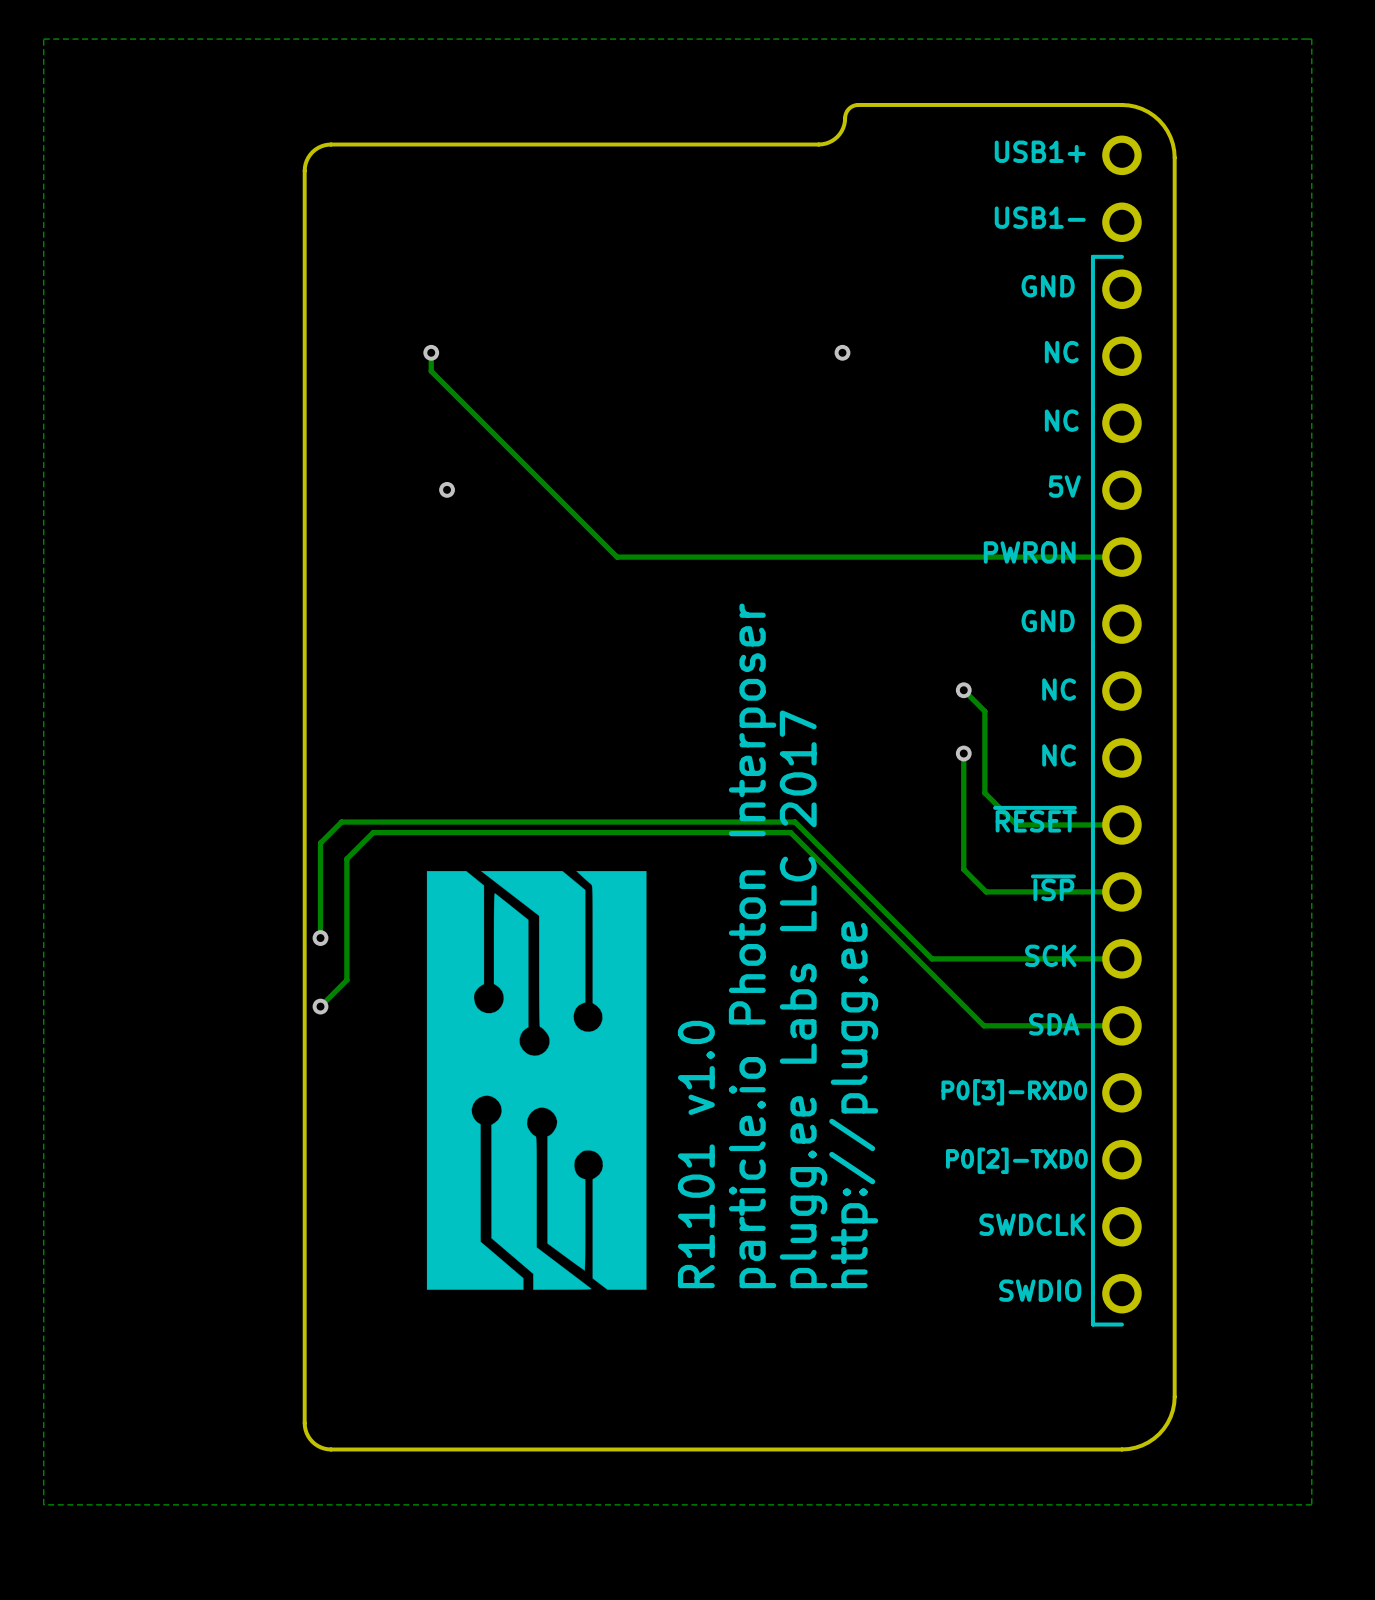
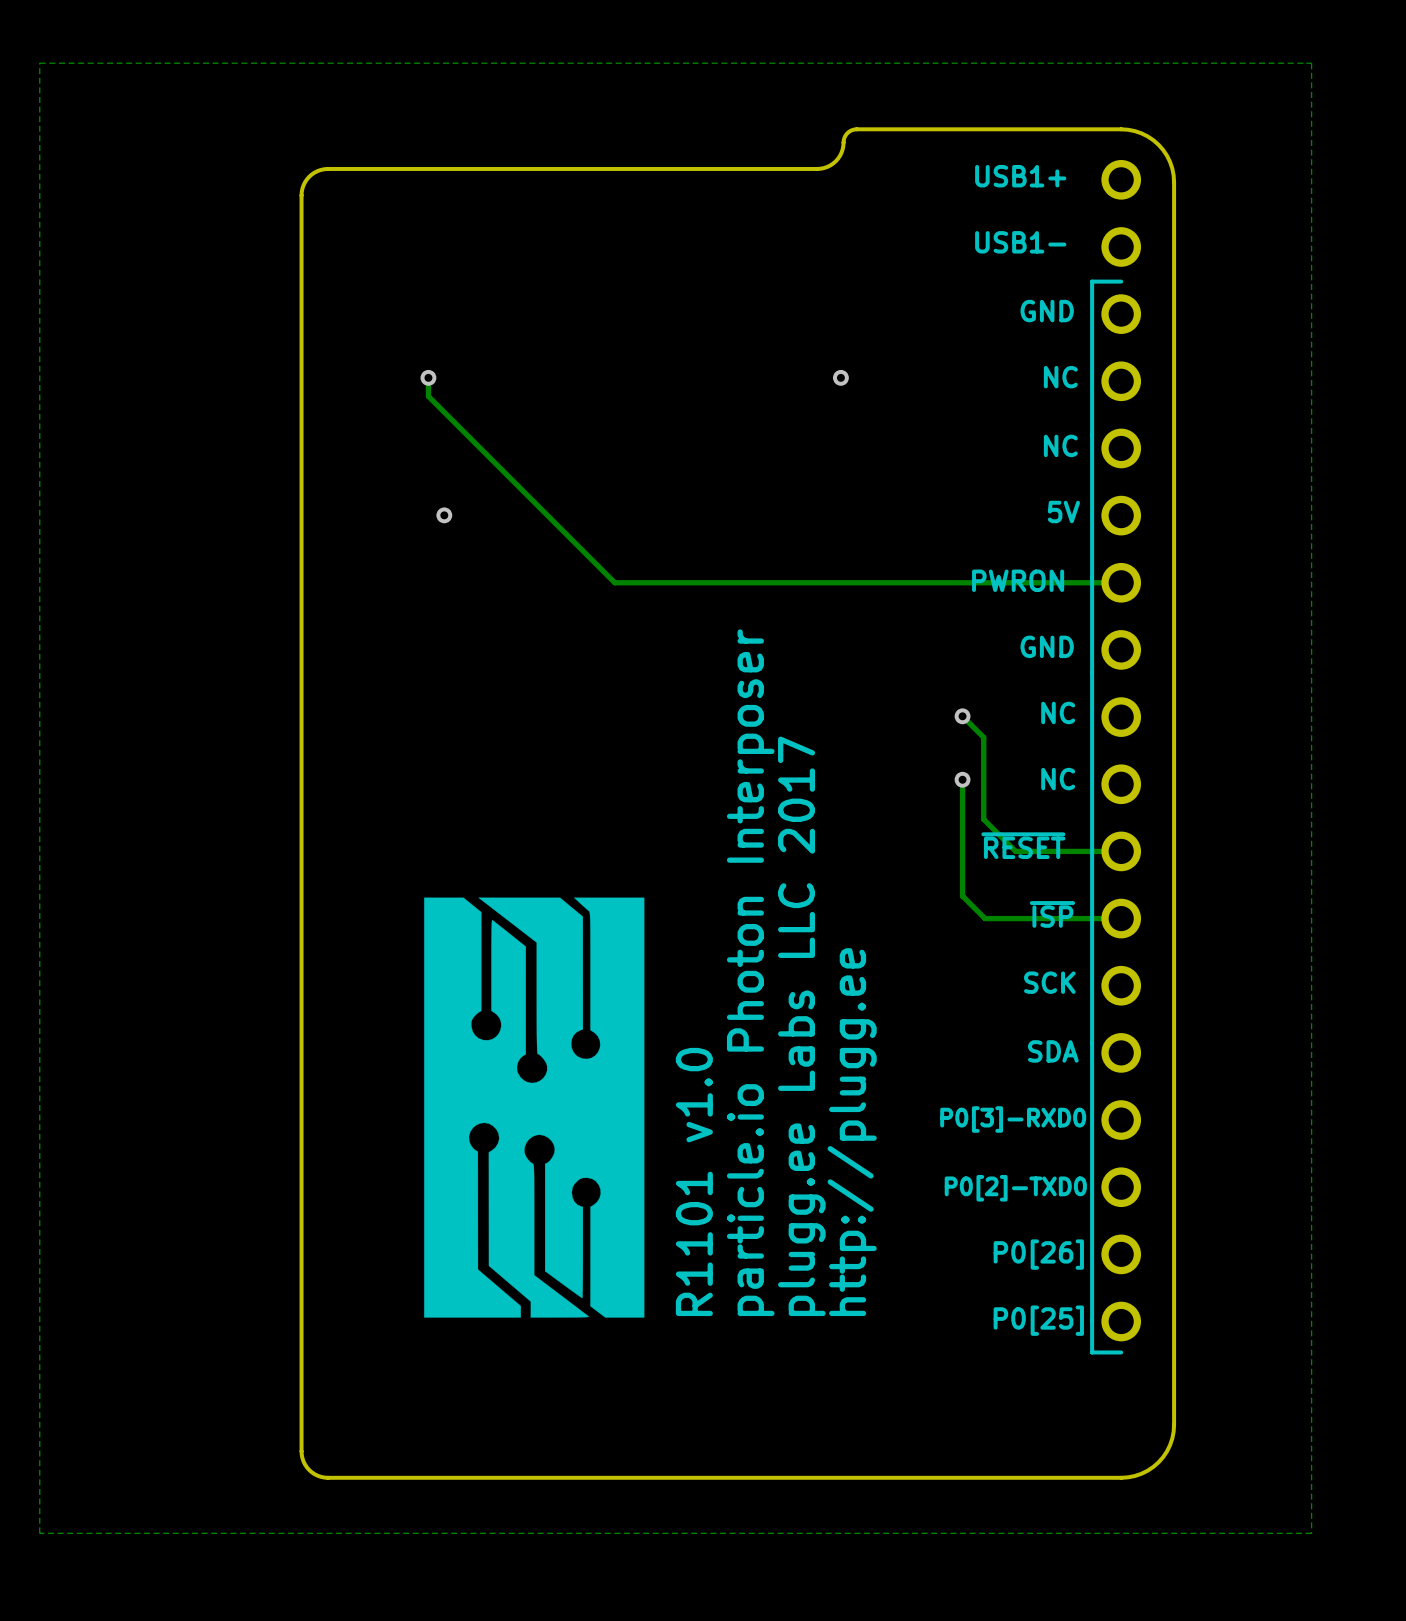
part footprint: [1090, 135, 1142, 1327] -> [1090, 159, 1142, 1355]
track: (320, 938) (320, 843) (341, 822) (795, 822) (931, 958) (1121, 958) -> none
via: (320, 938) -> none
track: (320, 1006) (346, 980) (346, 858) (373, 832) (790, 832) (983, 1025) (1121, 1025) -> none
via: (320, 1006) -> none

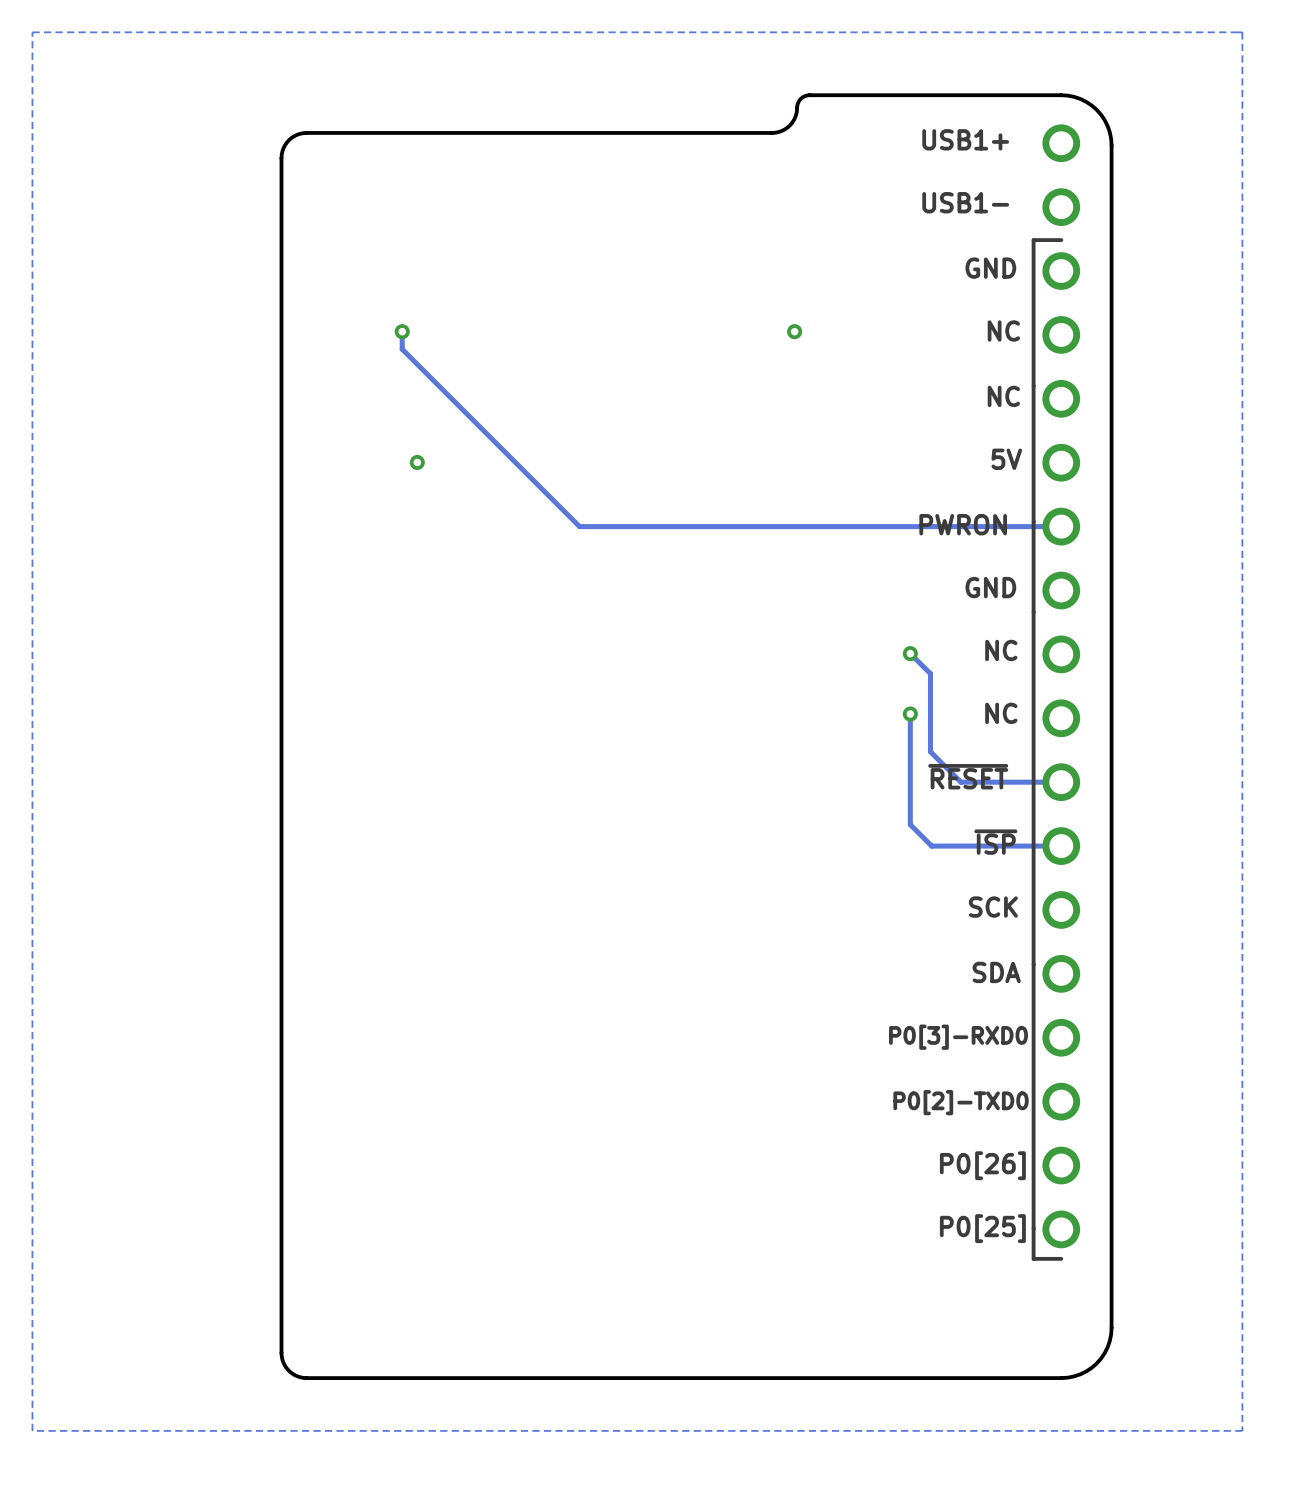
drawing: [424, 897, 645, 1318] -> none
text: particle.io Photon Interposer (750, 972) -> none
text: plugg.ee Labs LLC 2017 (801, 1026) -> none
text: http://plugg.ee (852, 1132) -> none
text: R1101 v1.0 (694, 1181) -> none

